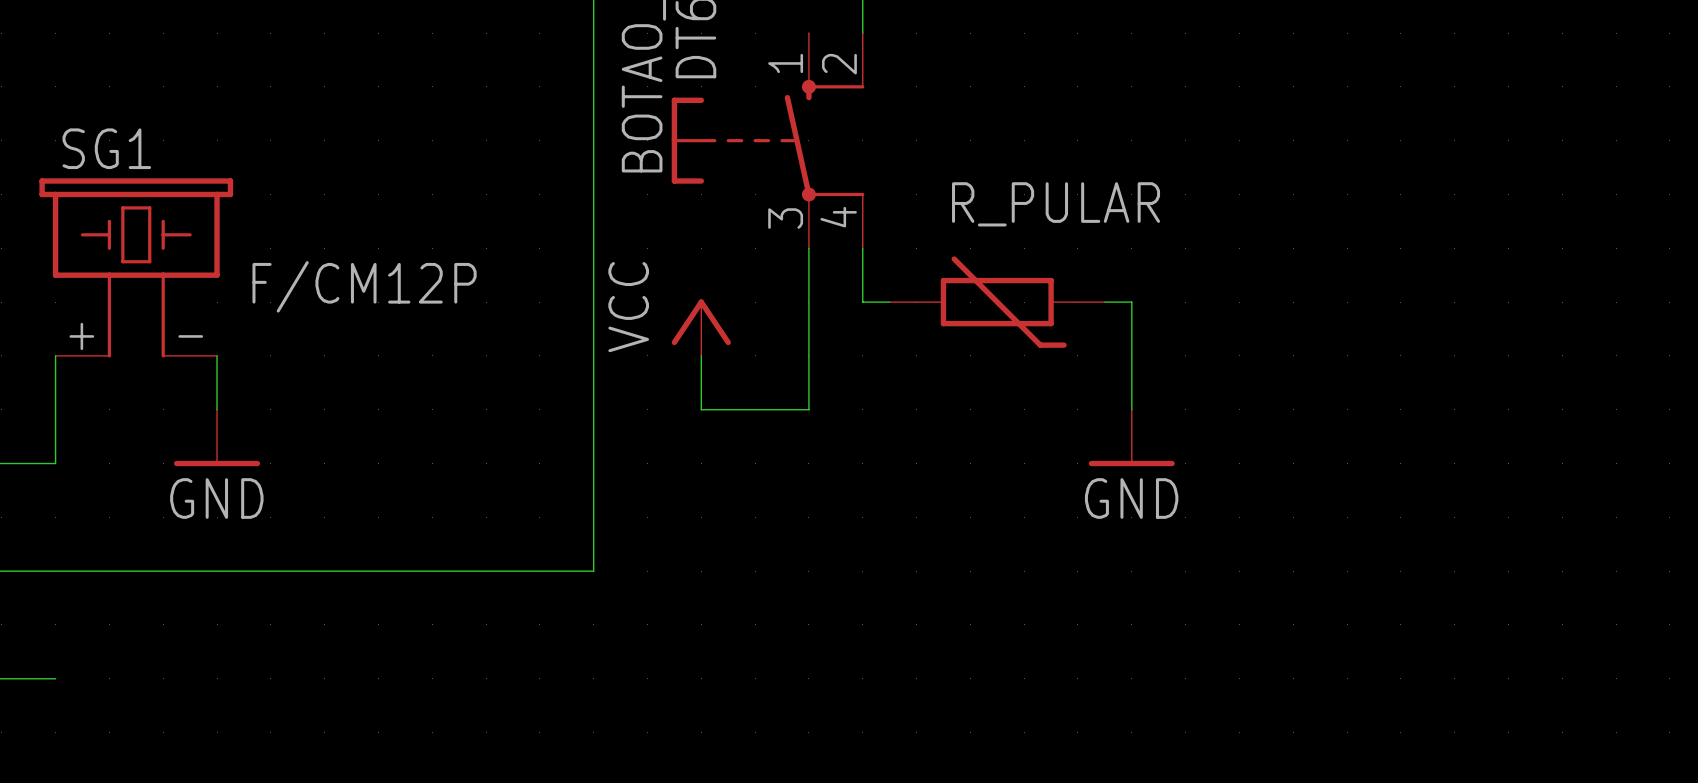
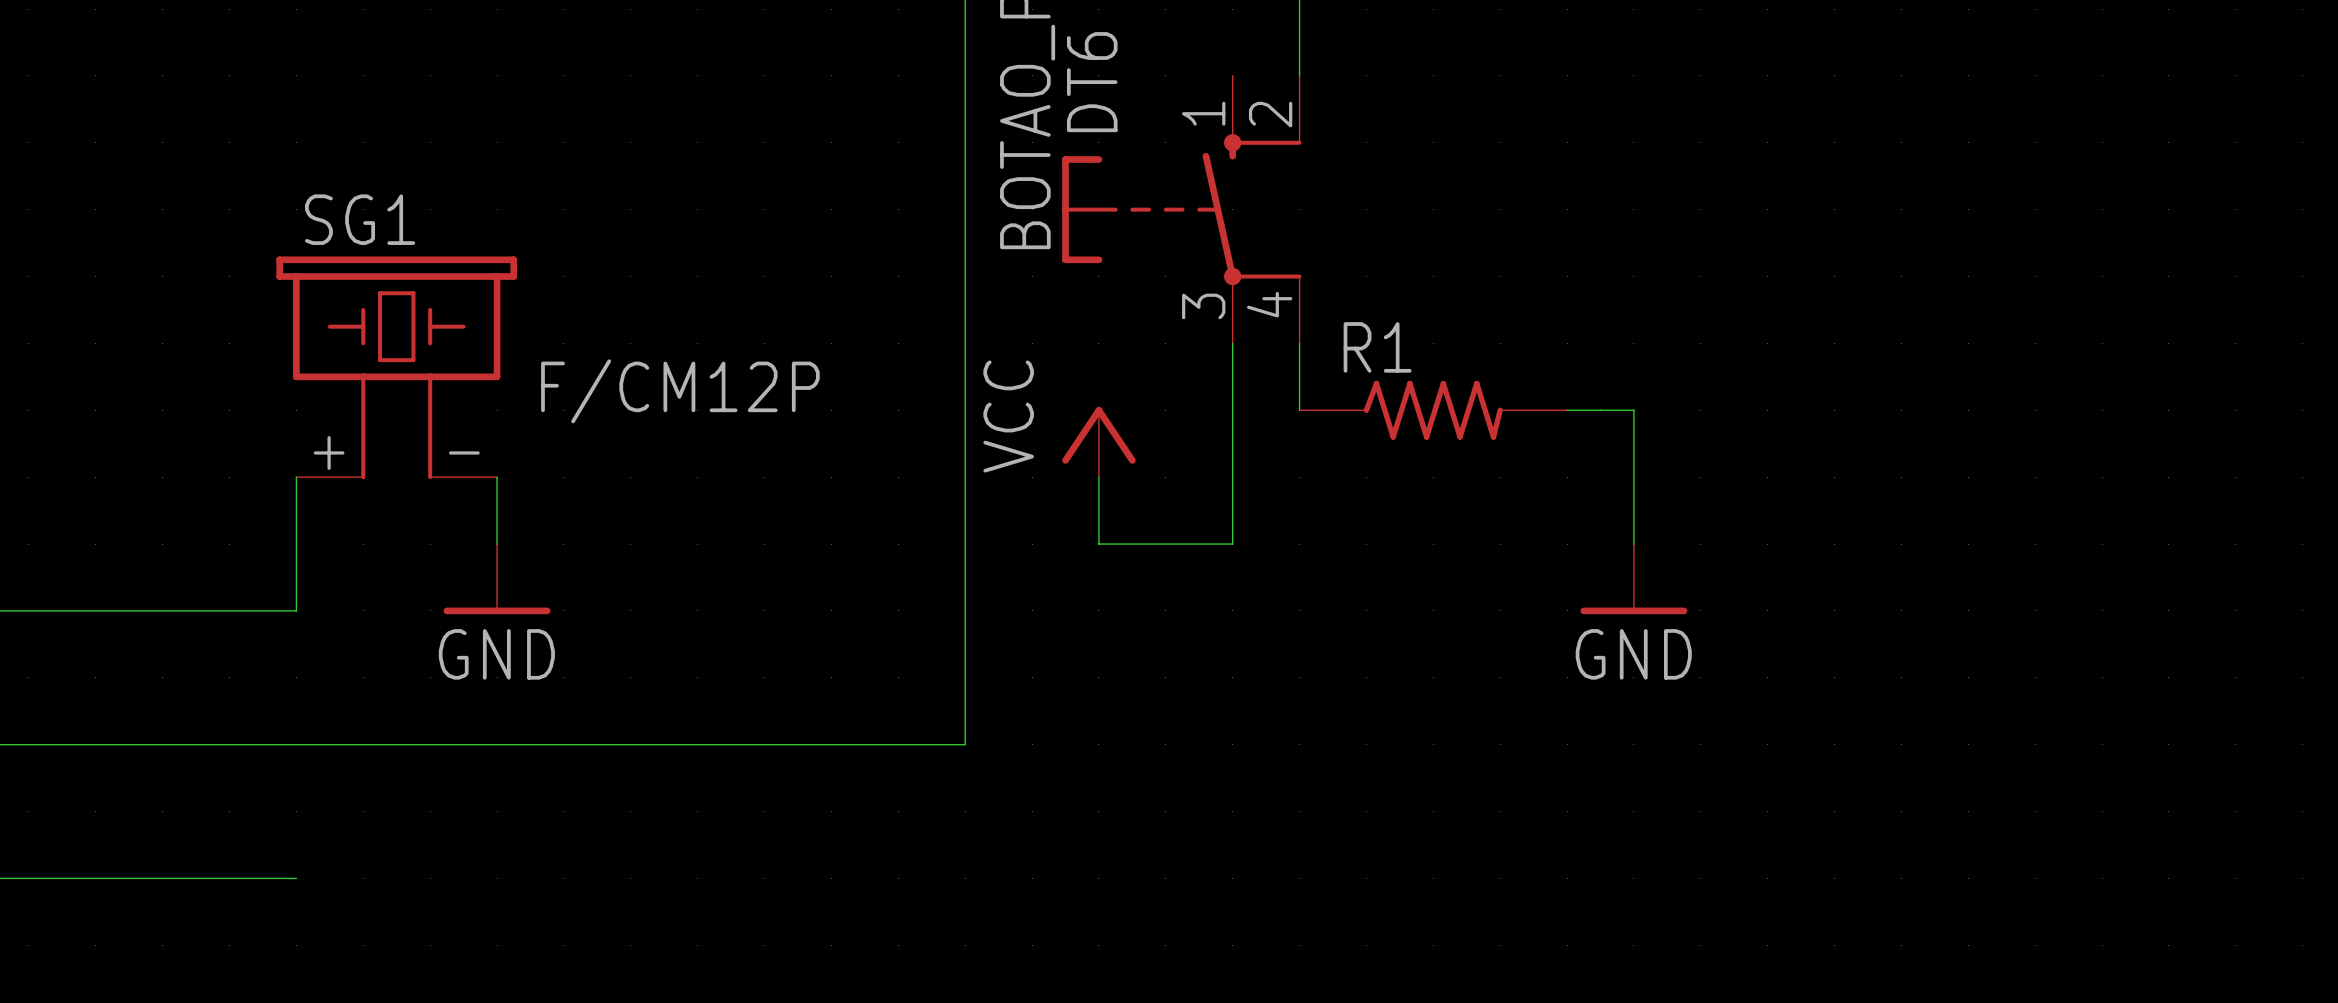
R1: none -> (1433, 410)
R_PULAR: (997, 302) -> none

